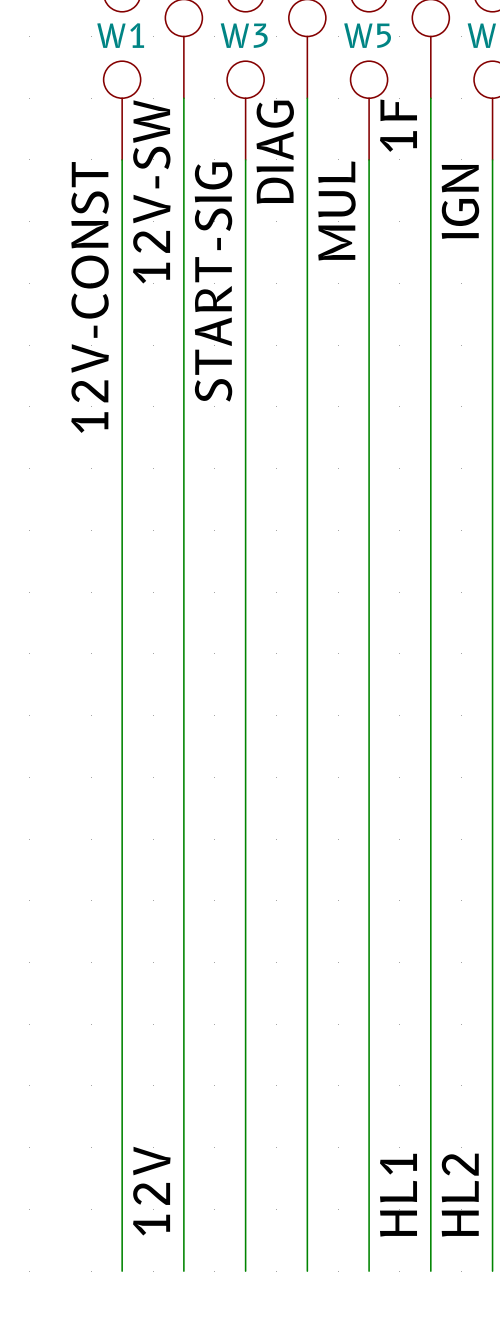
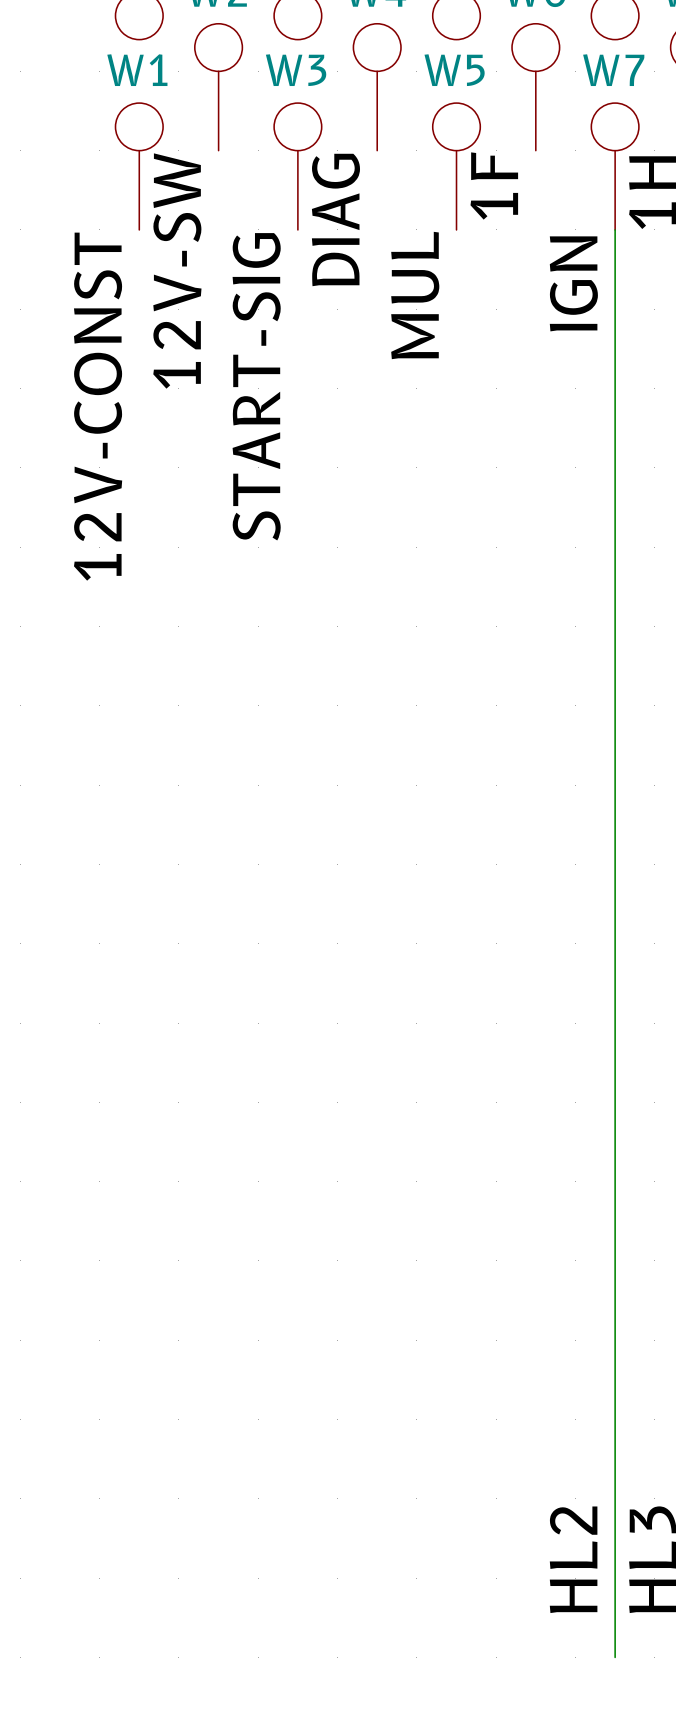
wire: (183, 98) (183, 1271) -> none
wire: (307, 98) (307, 1271) -> none
wire: (430, 98) (430, 1271) -> none
wire: (122, 159) (122, 1271) -> none
wire: (245, 159) (245, 1271) -> none
wire: (369, 159) (369, 1271) -> none
label: 12V (151, 1191) -> none
label: HL1 (398, 1195) -> none

